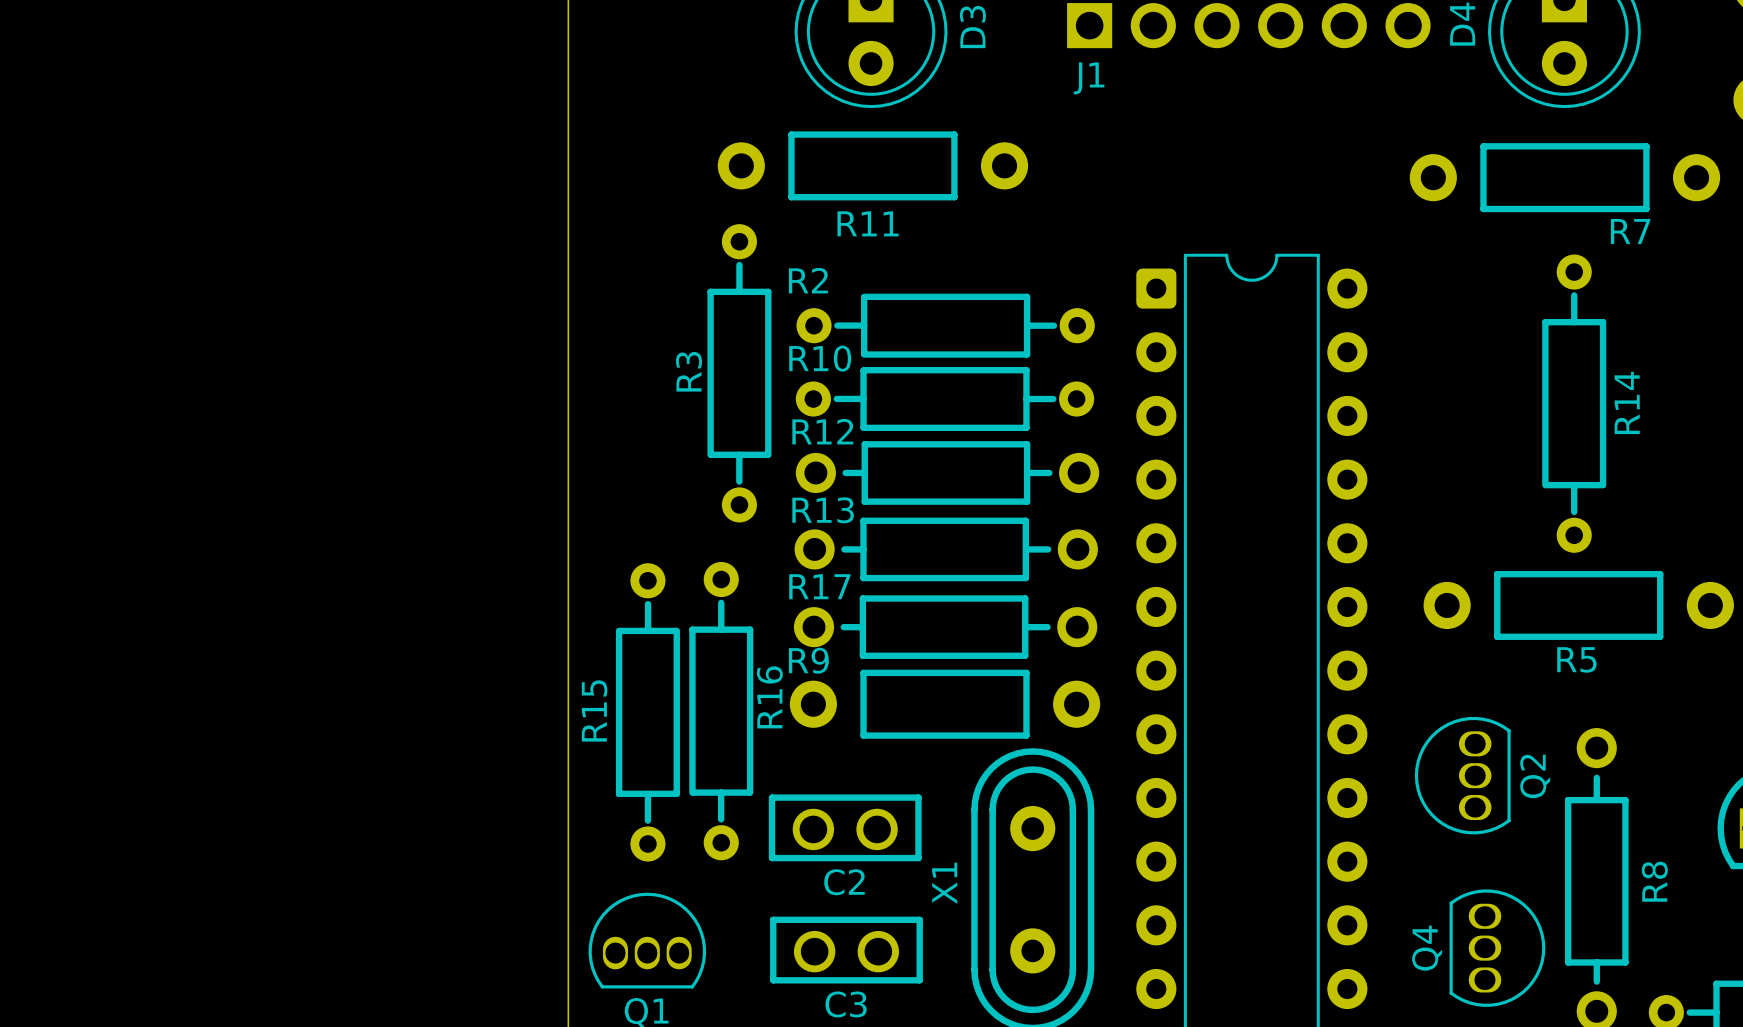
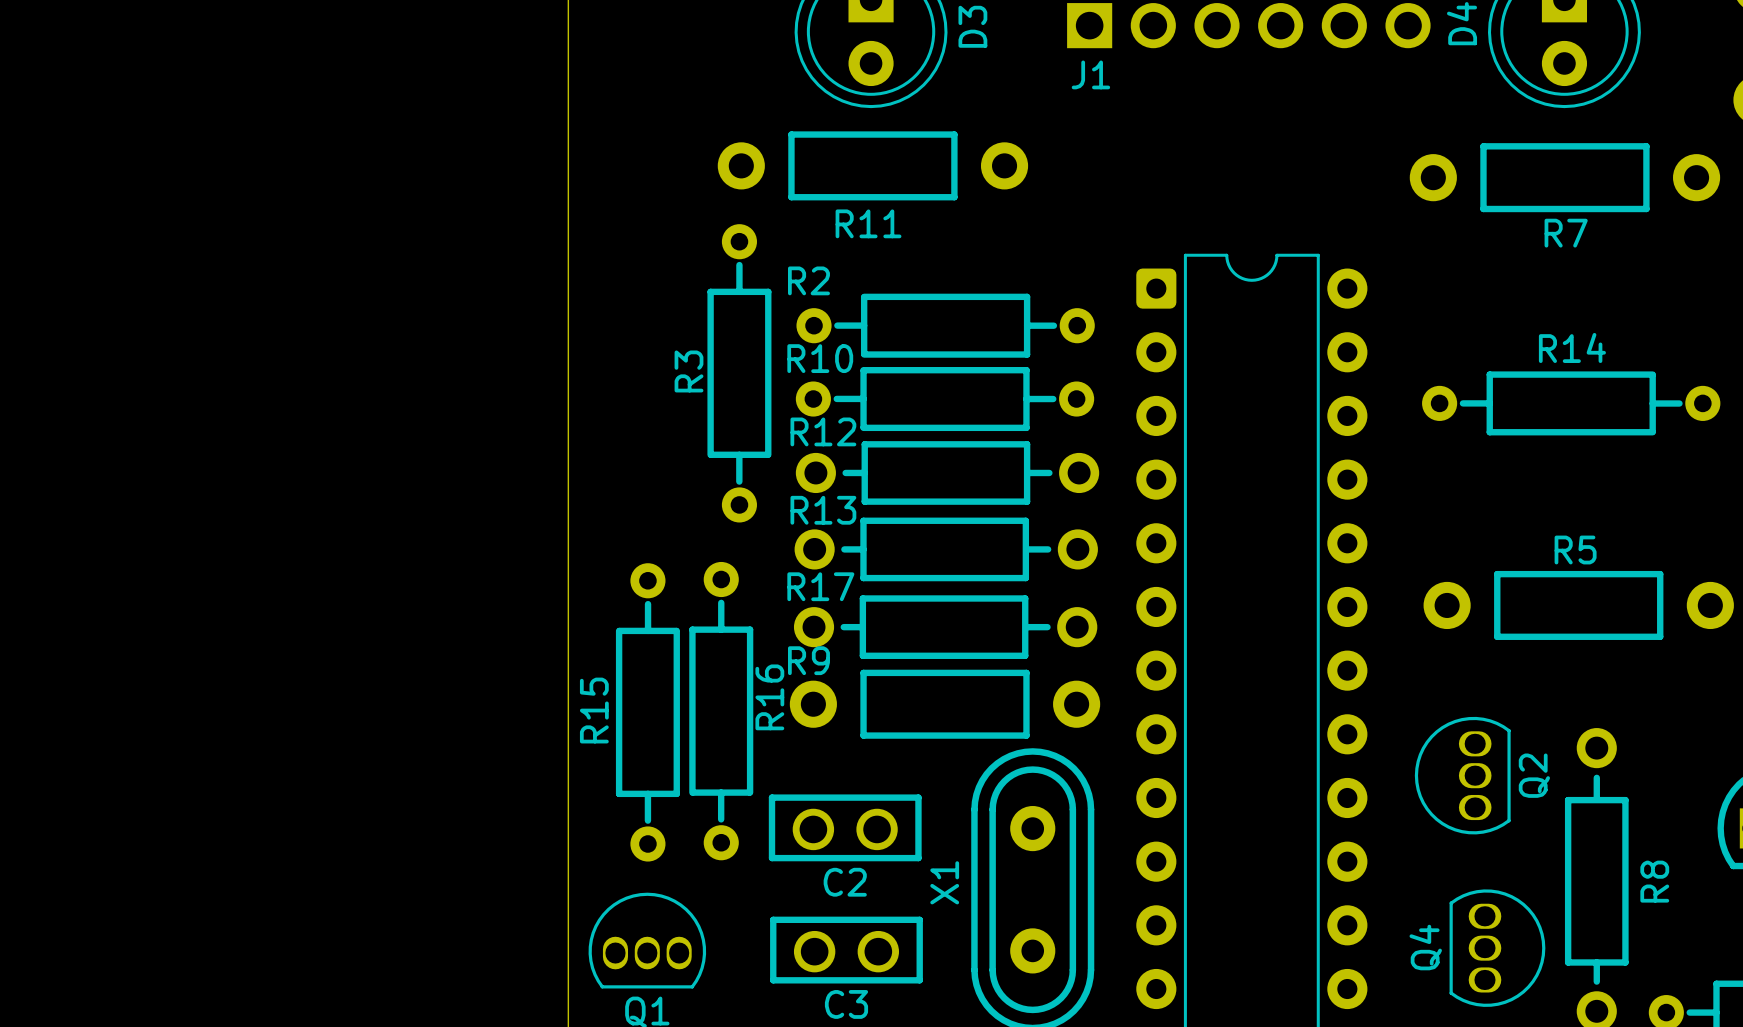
R7 name position: R7 (1630, 231) -> R7 (1566, 233)
R14 rotation: 0° (1574, 403) -> 90° counterclockwise (1571, 403)
R5 name position: R5 (1576, 659) -> R5 (1575, 550)

